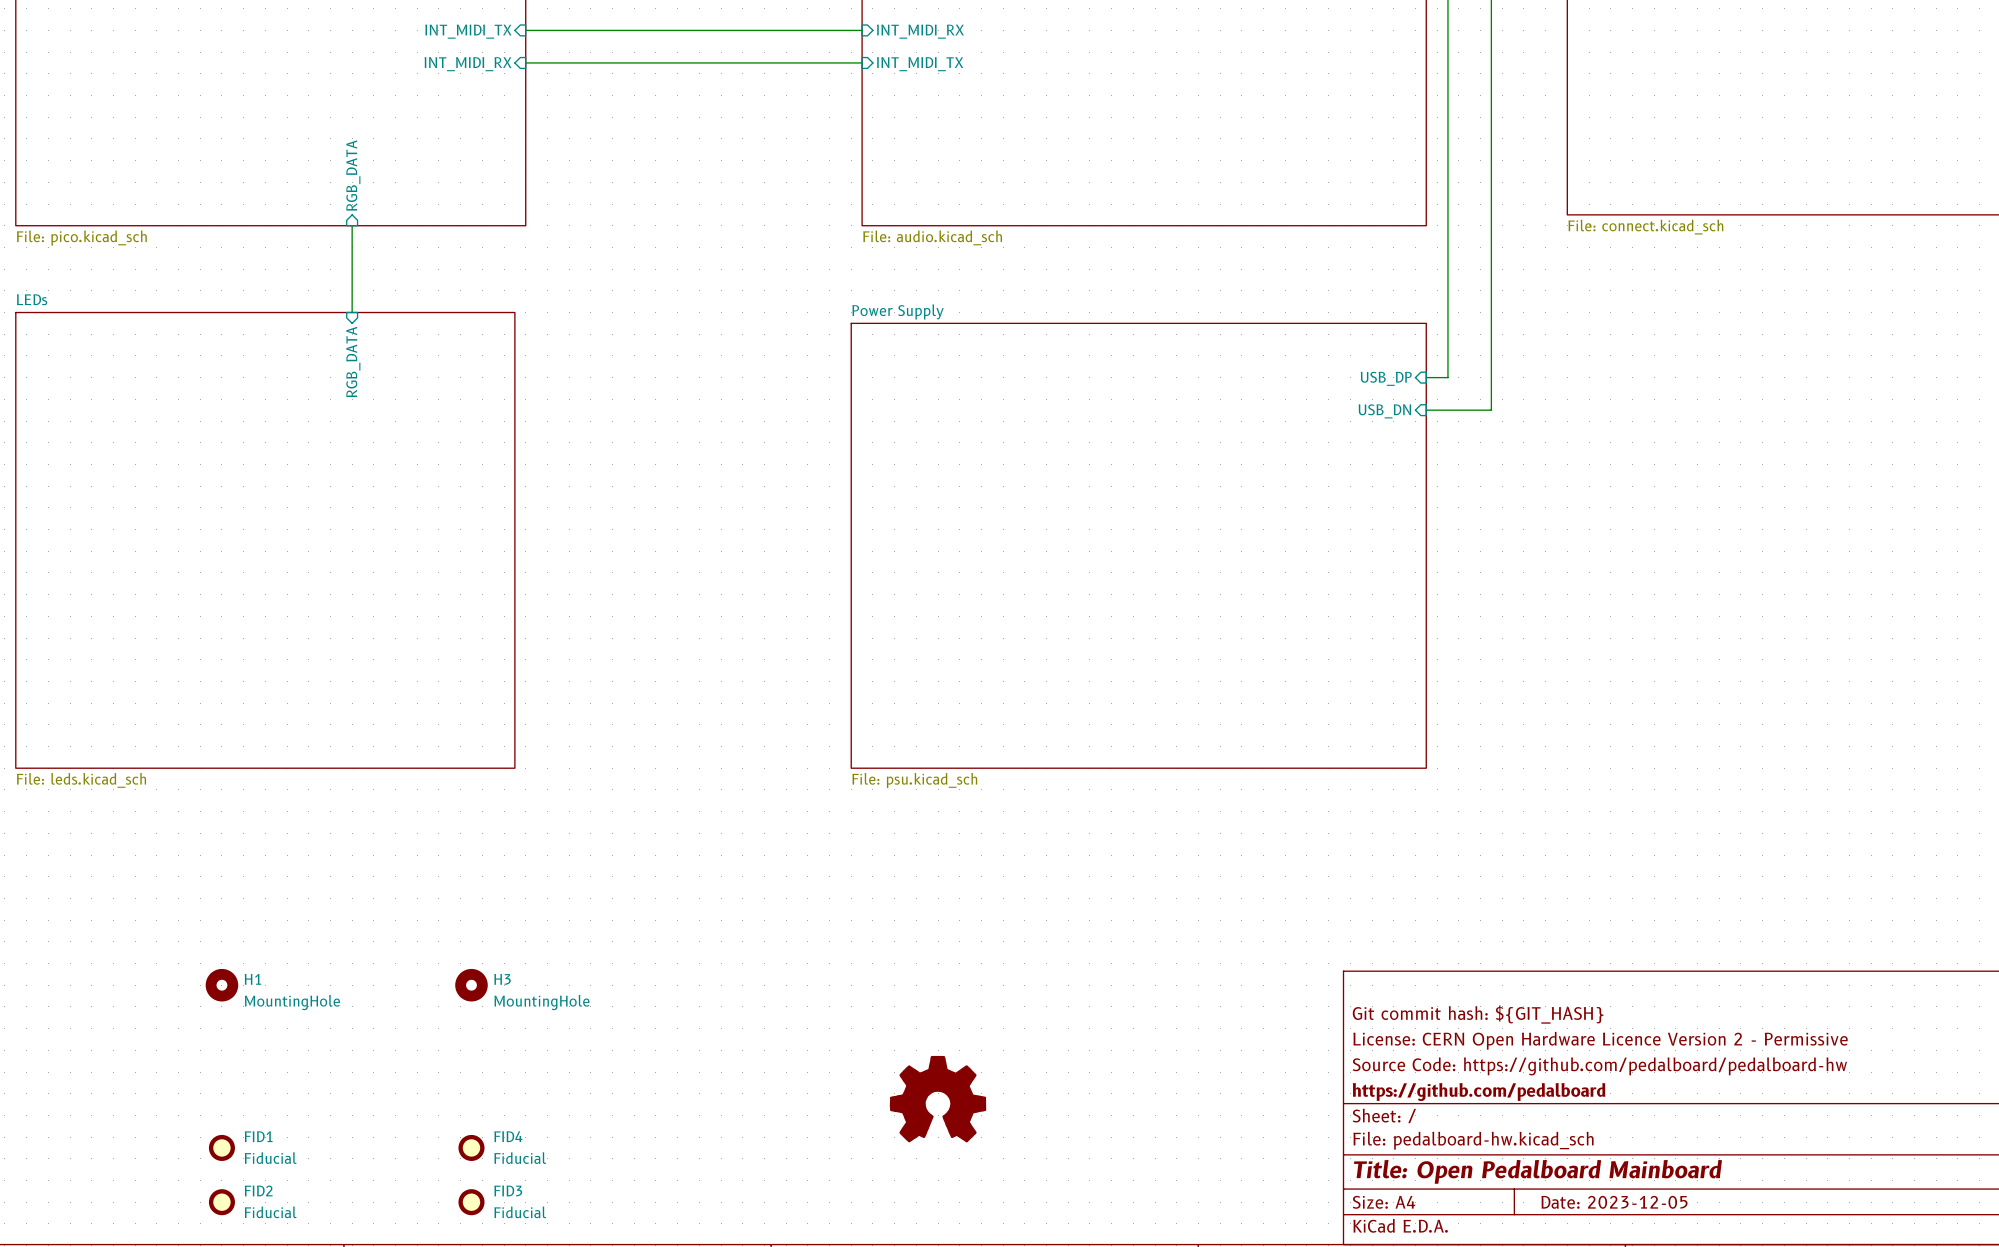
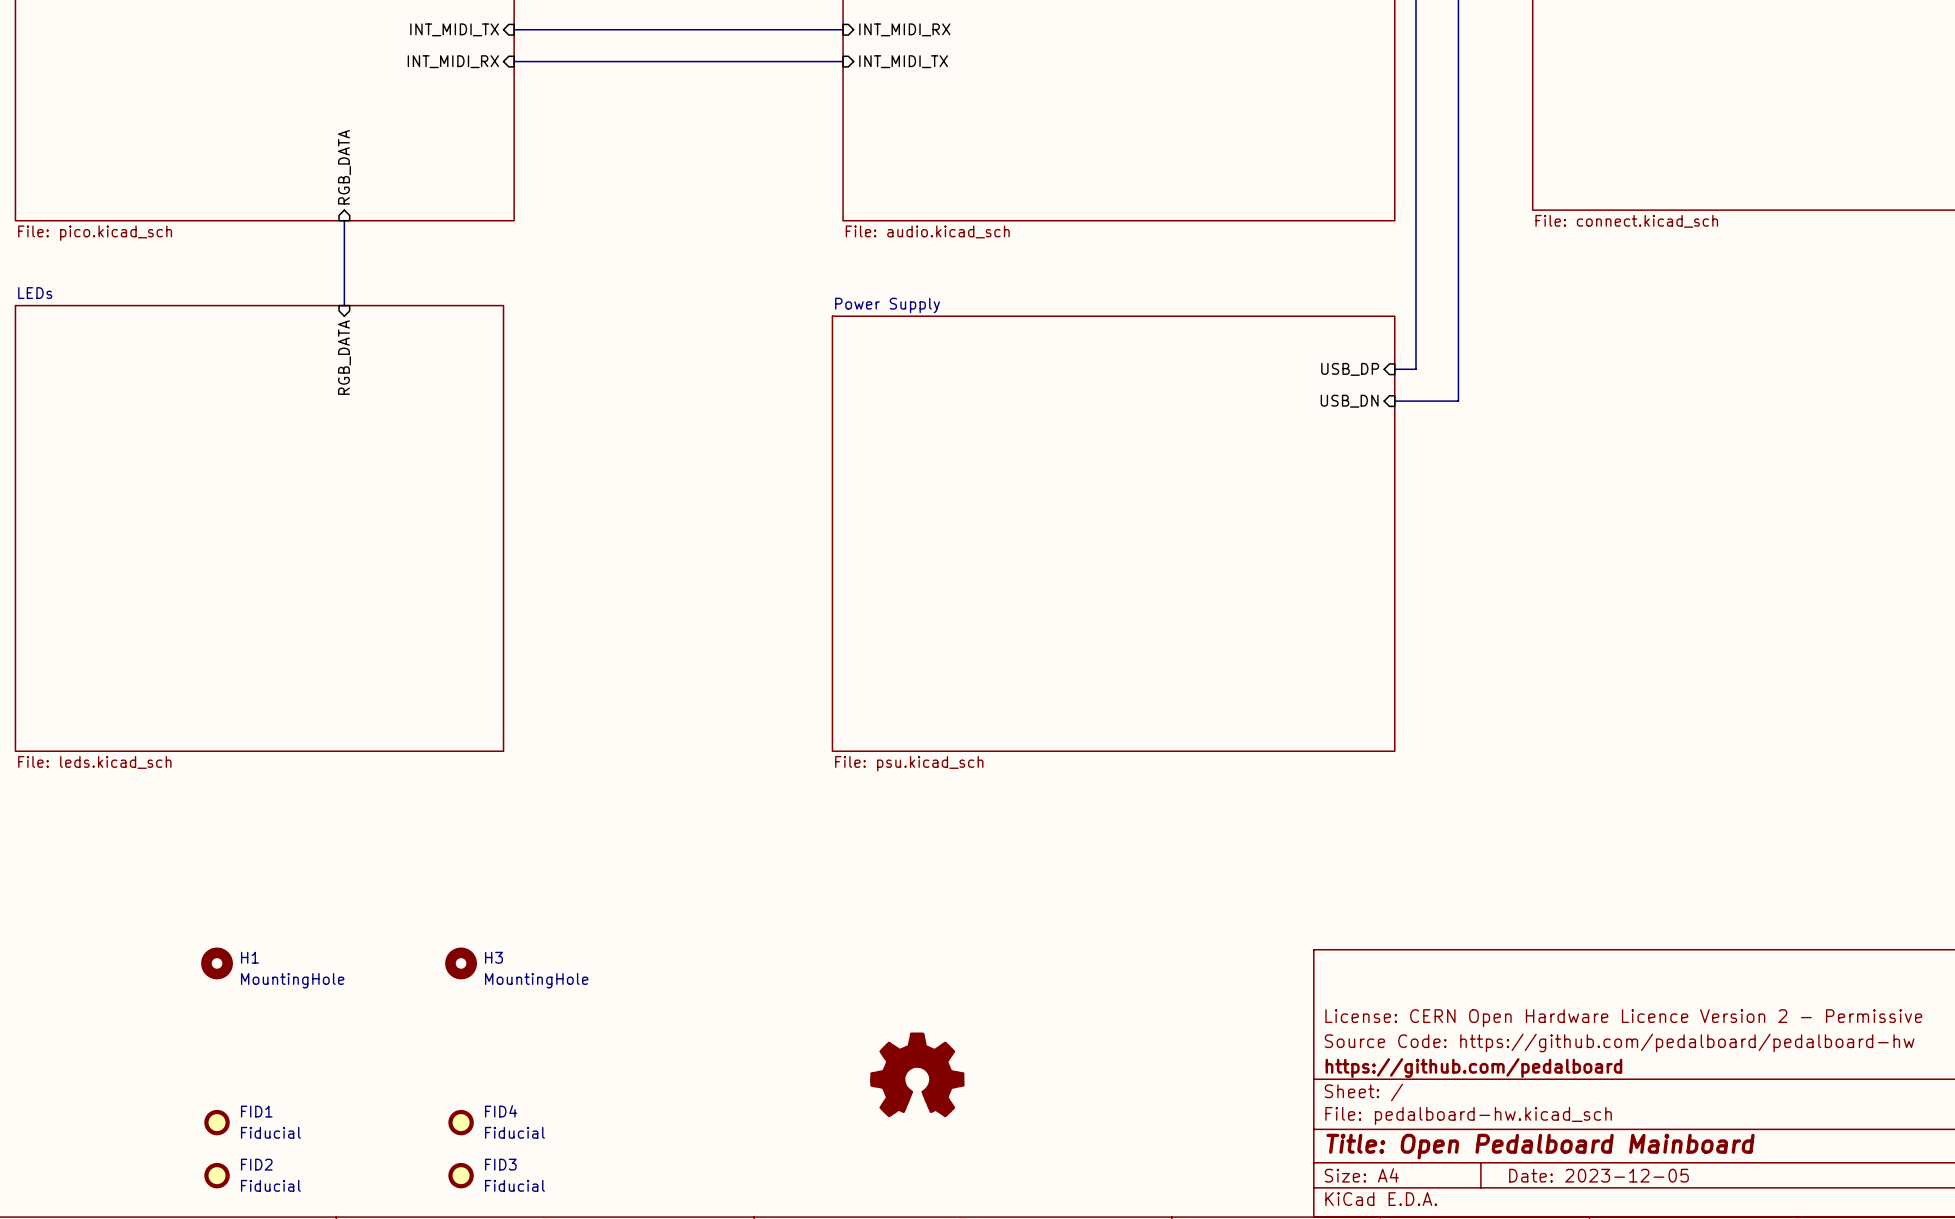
title block: Git commit hash: ${GIT_HASH} (1478, 1014) -> none

